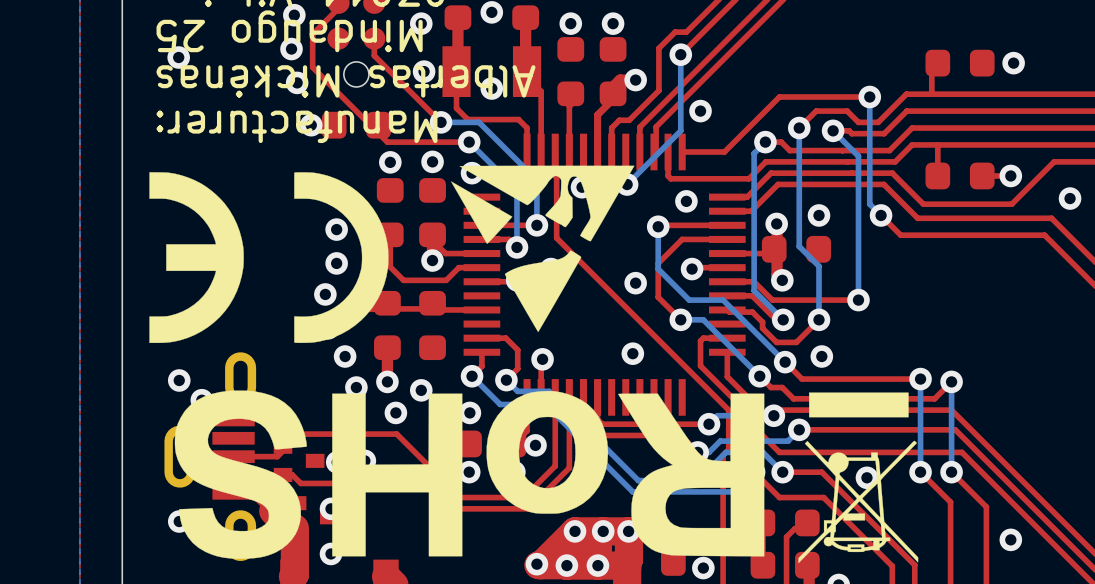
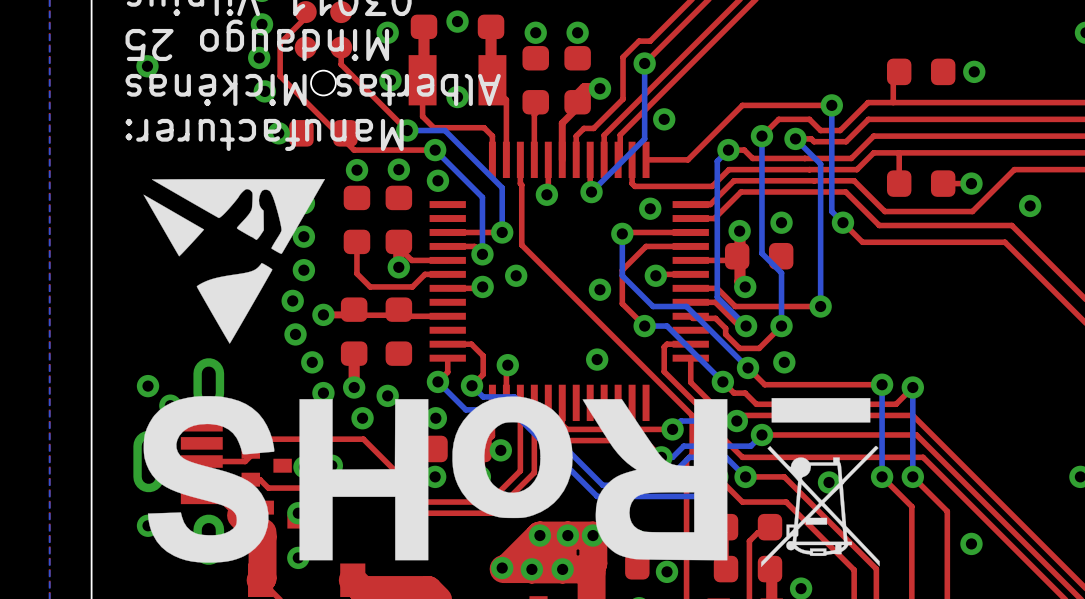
drawing: [149, 172, 389, 344] -> none
drawing position: (542, 248) -> (234, 261)

